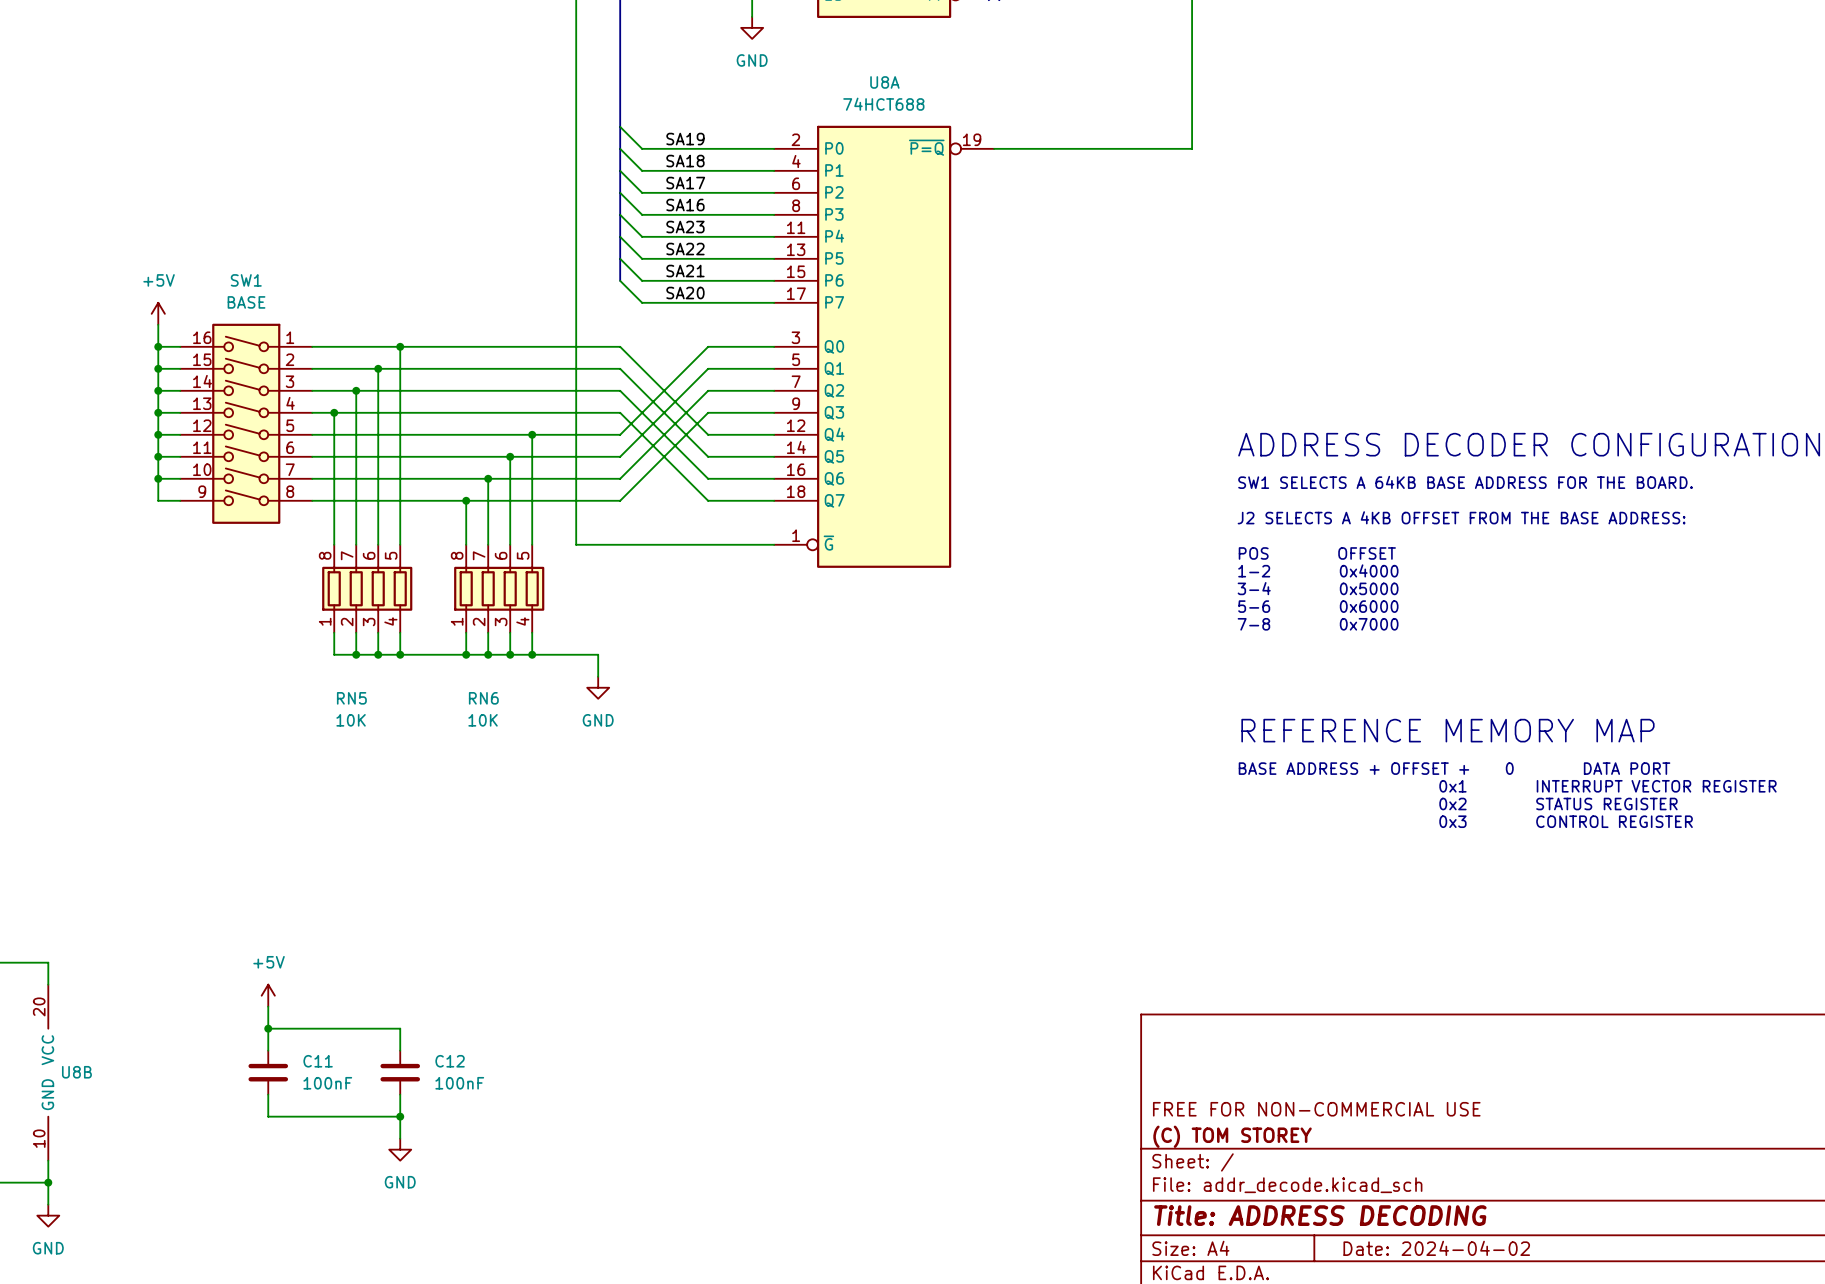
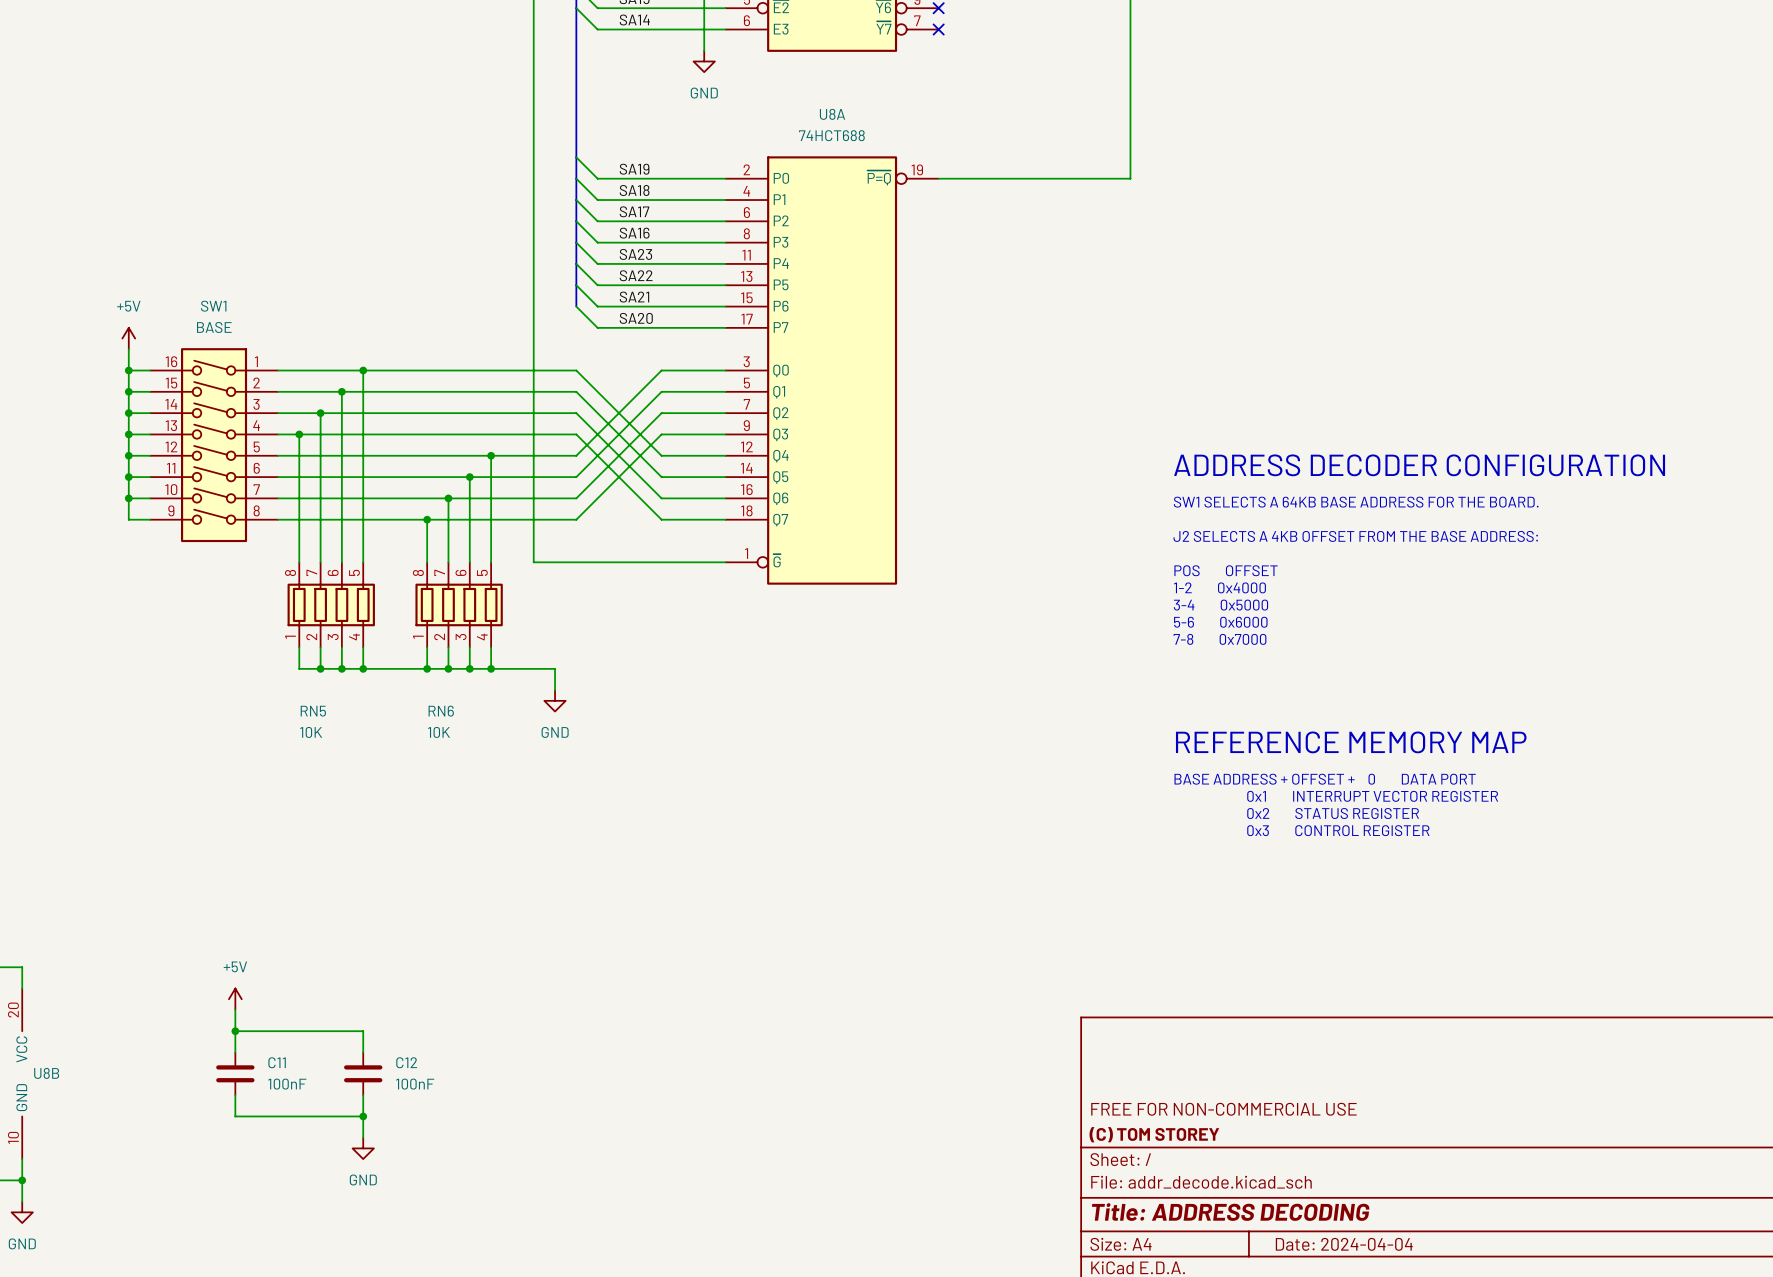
title block: Date: 2024-04-02 (1436, 1248) -> Date: 2024-04-04 (1344, 1244)

